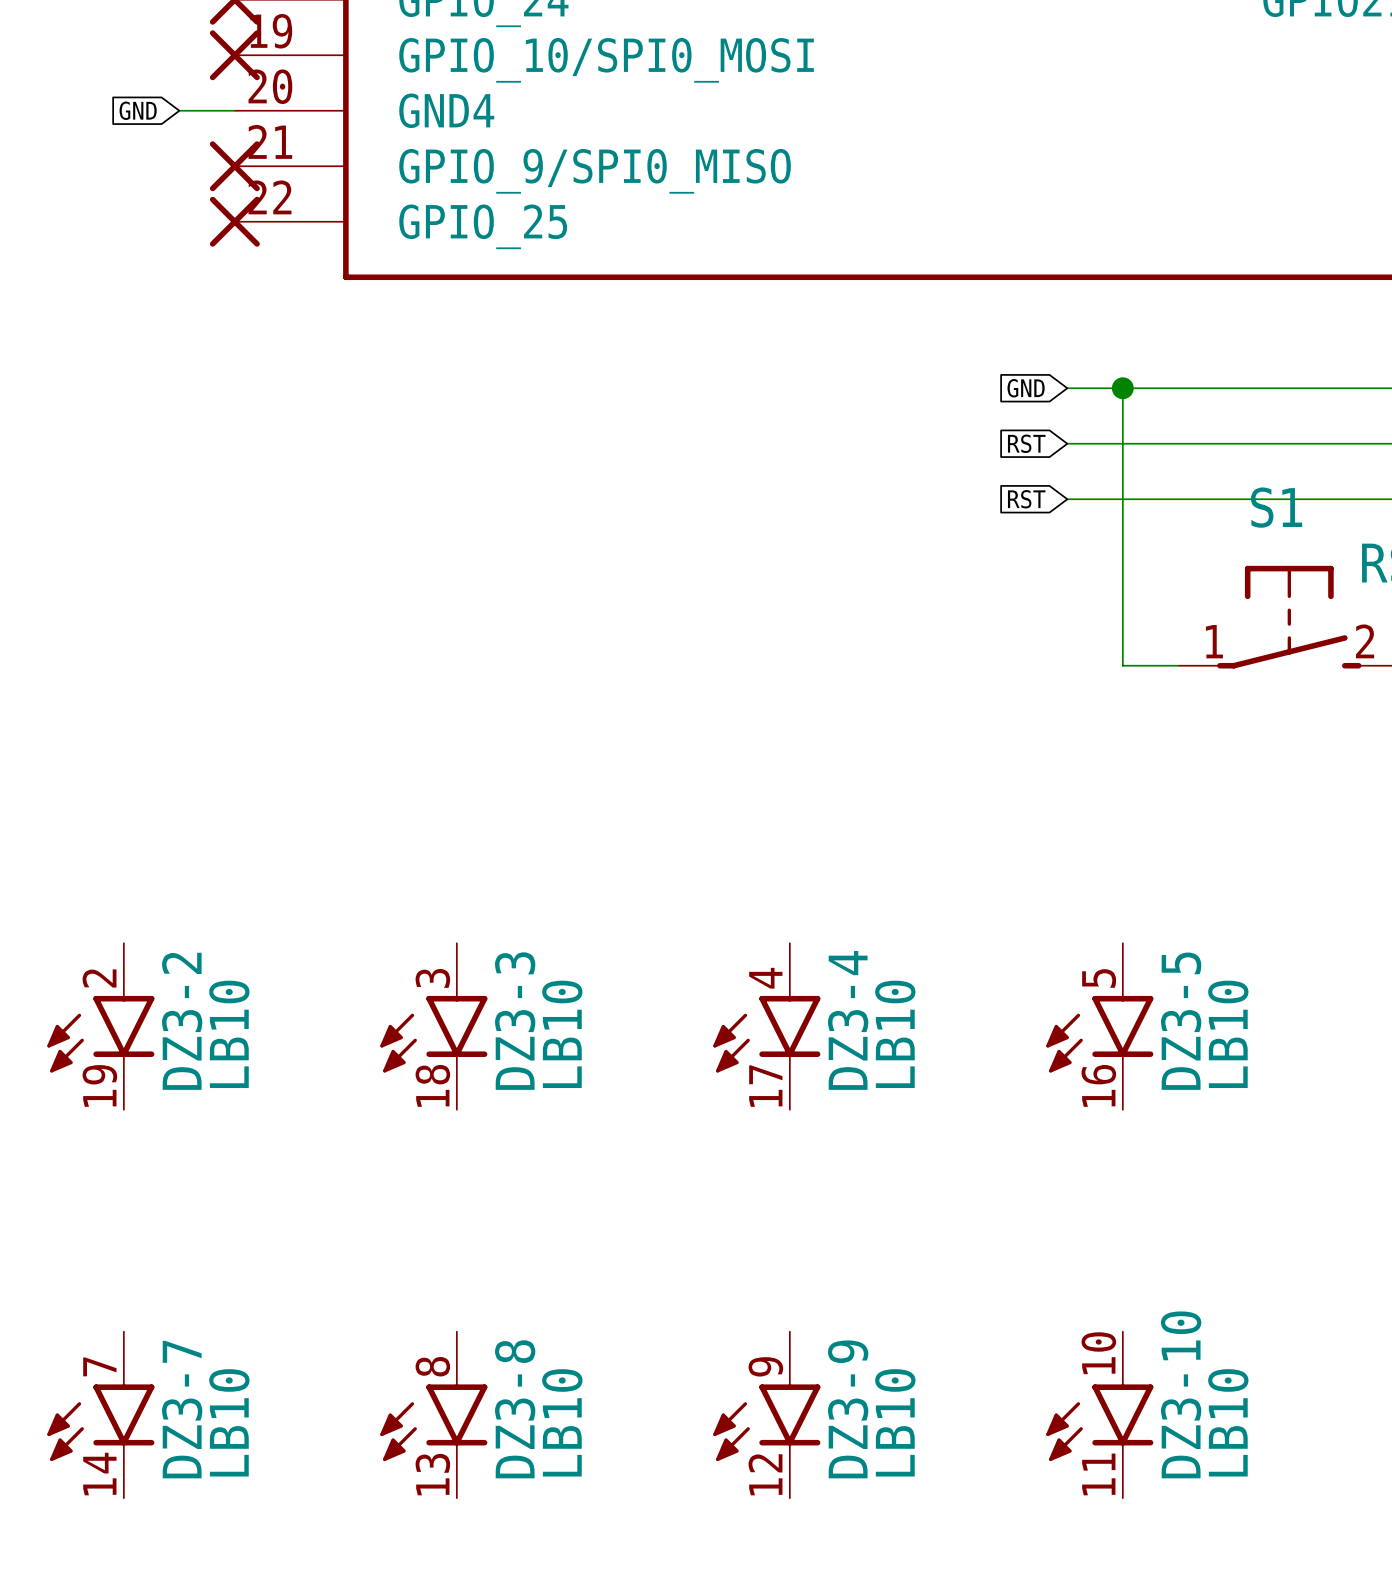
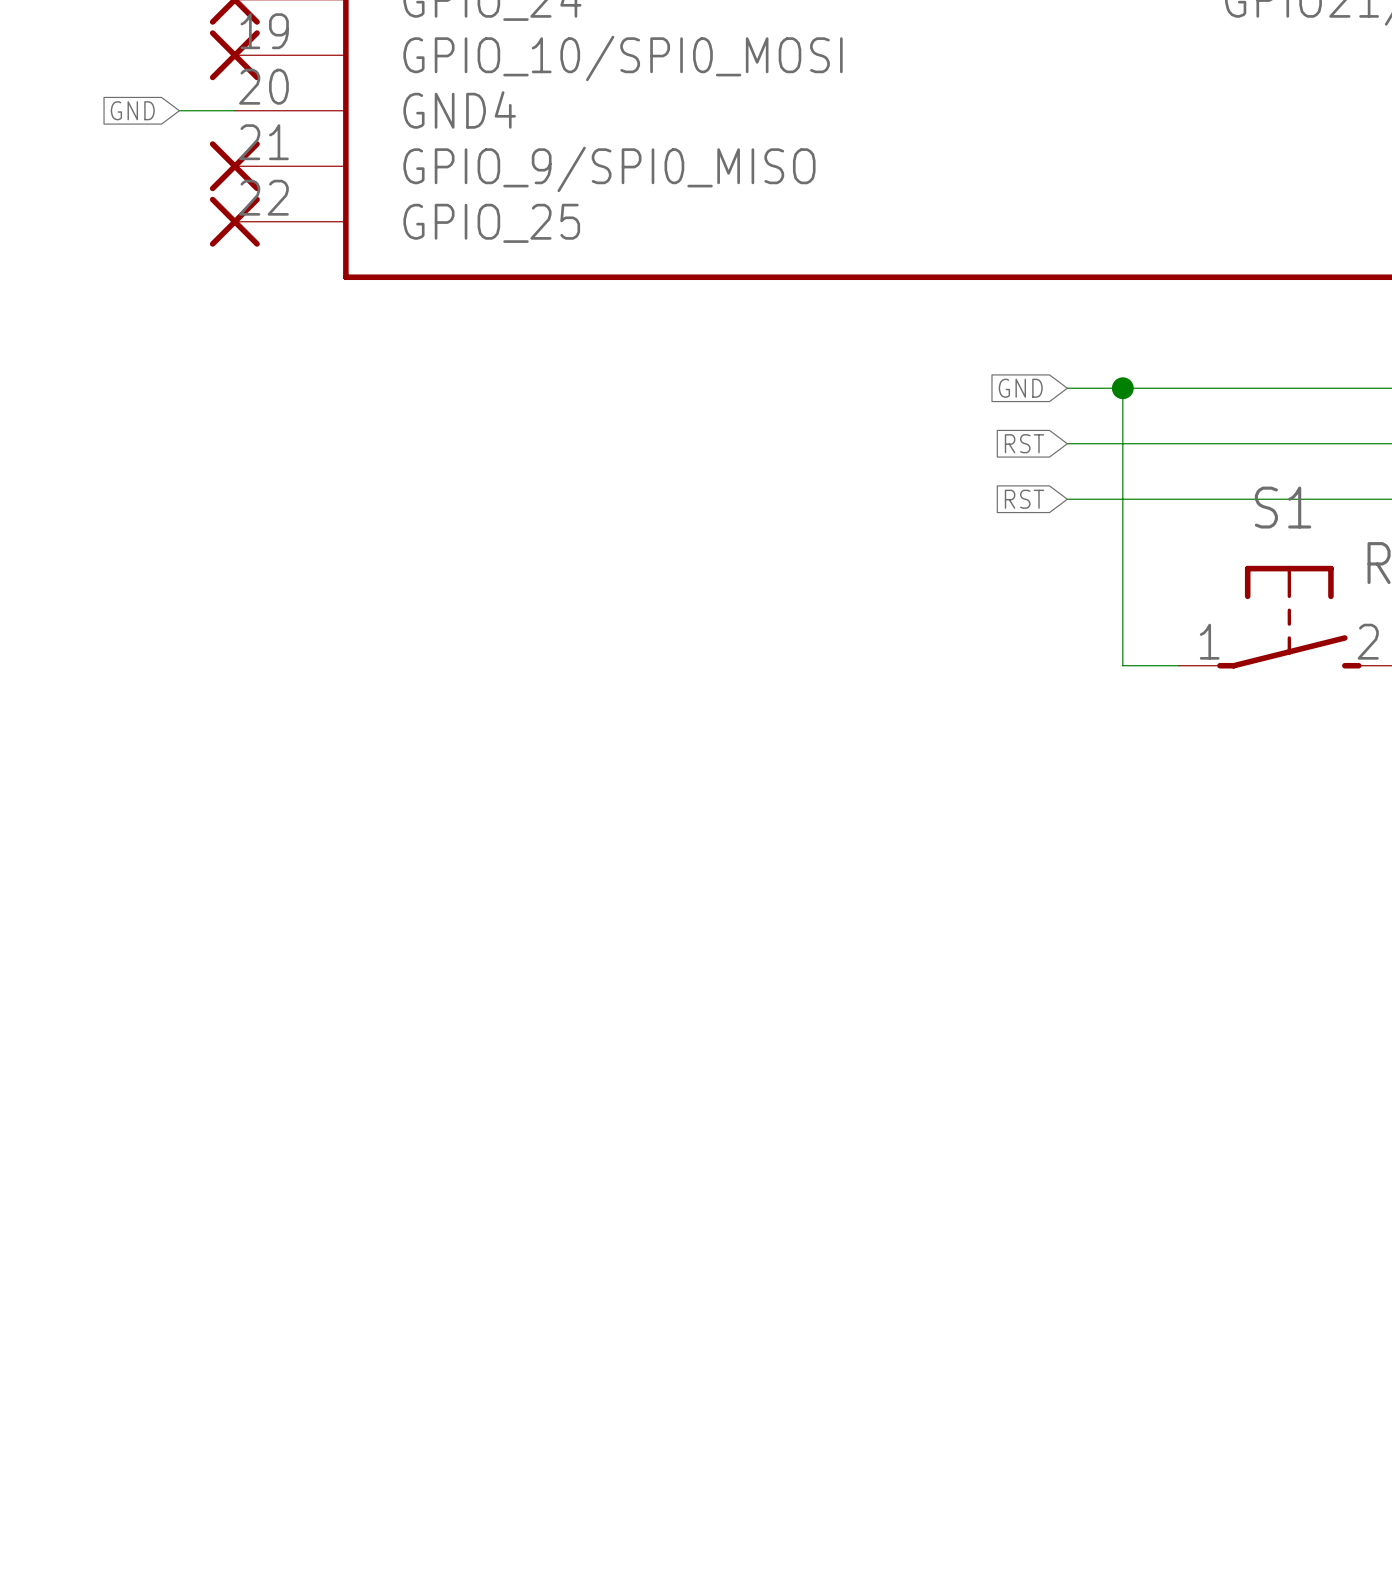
DZ3-2: LB10 (100, 1026) -> none
DZ3-3: LB10 (433, 1026) -> none
DZ3-4: LB10 (766, 1026) -> none
DZ3-5: LB10 (1099, 1026) -> none
DZ3-7: LB10 (100, 1414) -> none
DZ3-8: LB10 (433, 1414) -> none
DZ3-9: LB10 (766, 1414) -> none
DZ3-10: LB10 (1099, 1414) -> none

